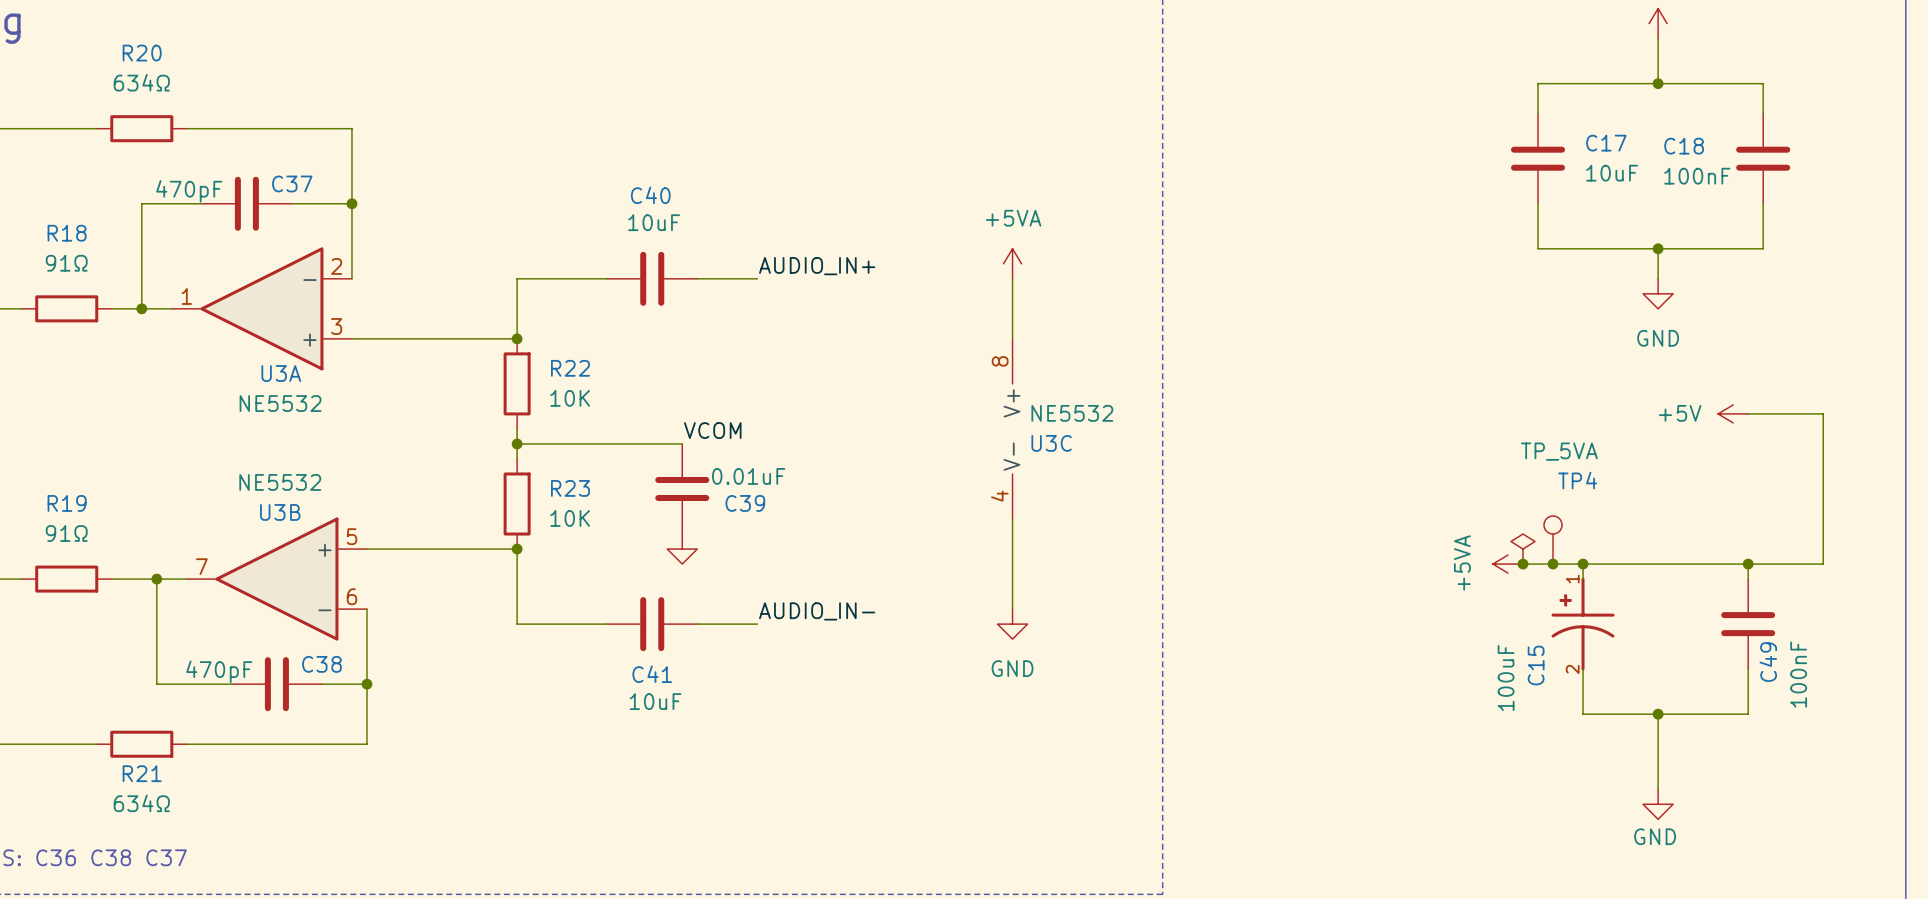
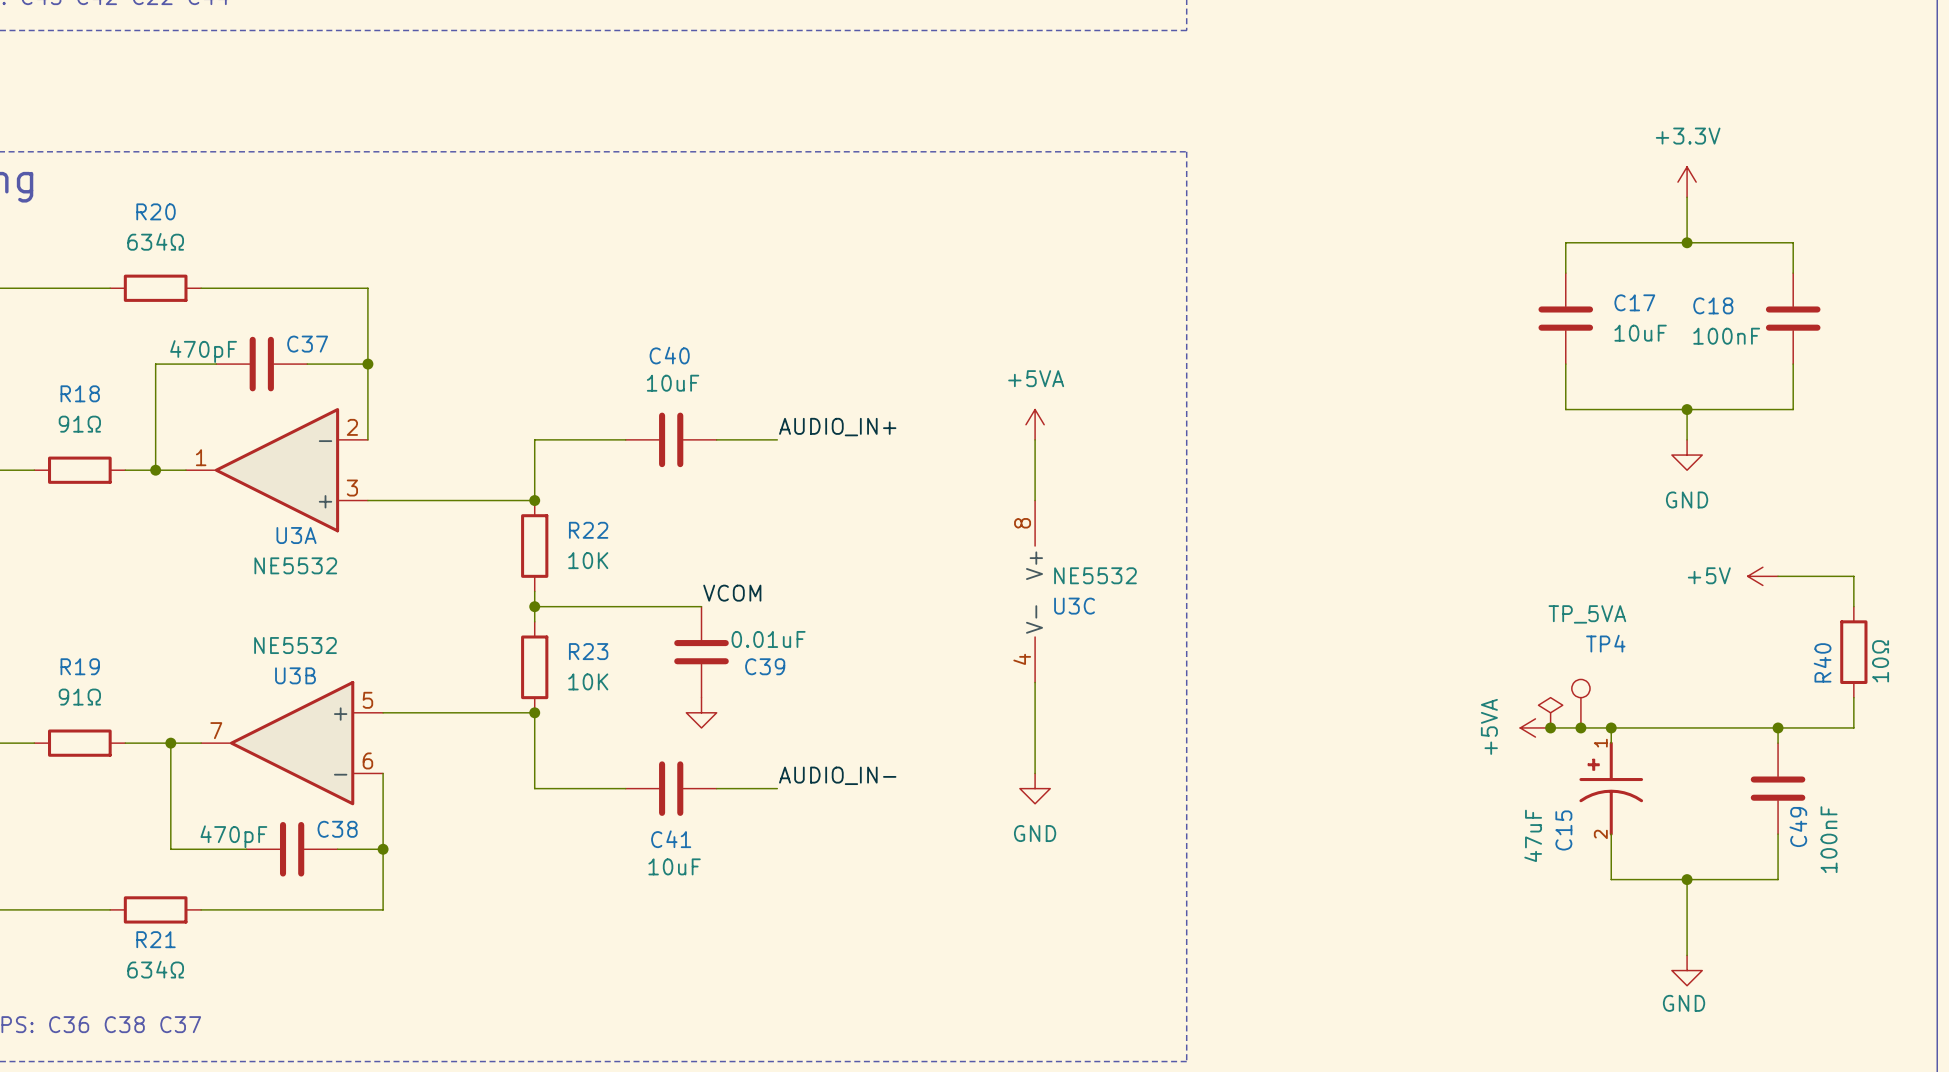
wire: (1823, 443) (1823, 534) -> none
R40: none -> 10Ω (1853, 652)
C15 value: 100uF (1506, 678) -> 47uF (1533, 835)

